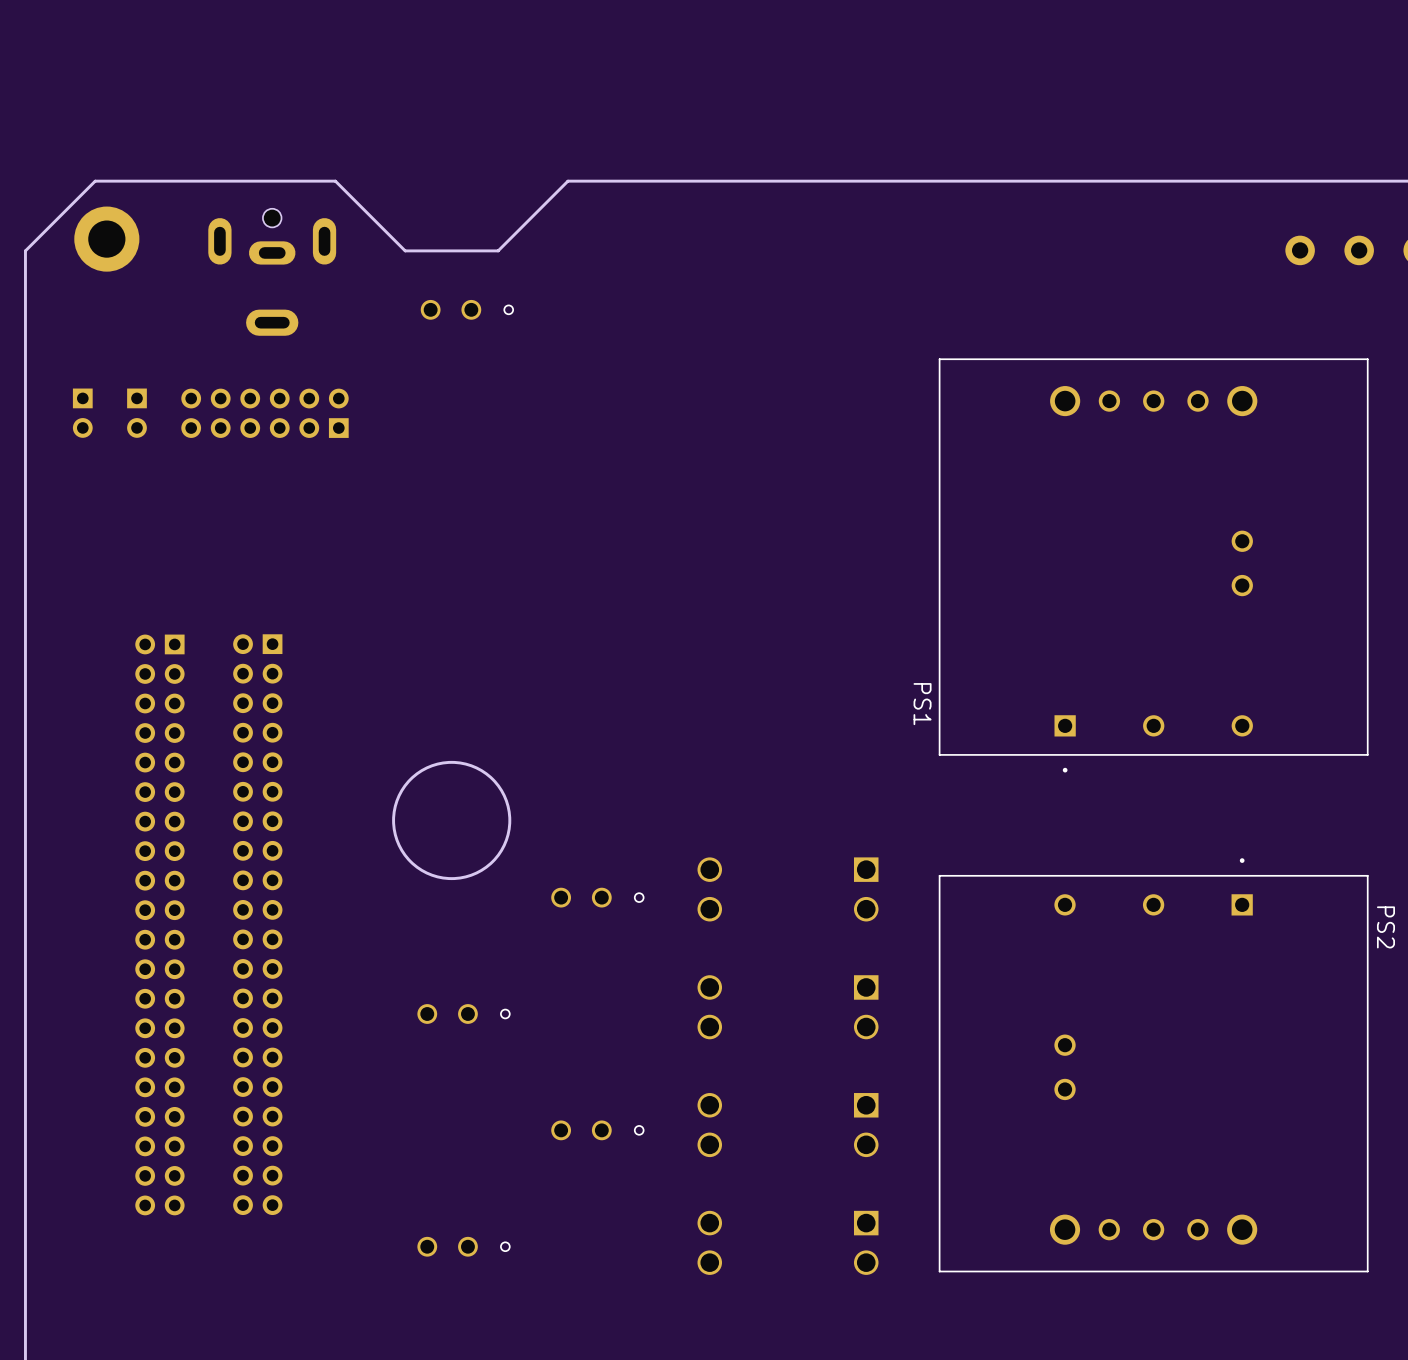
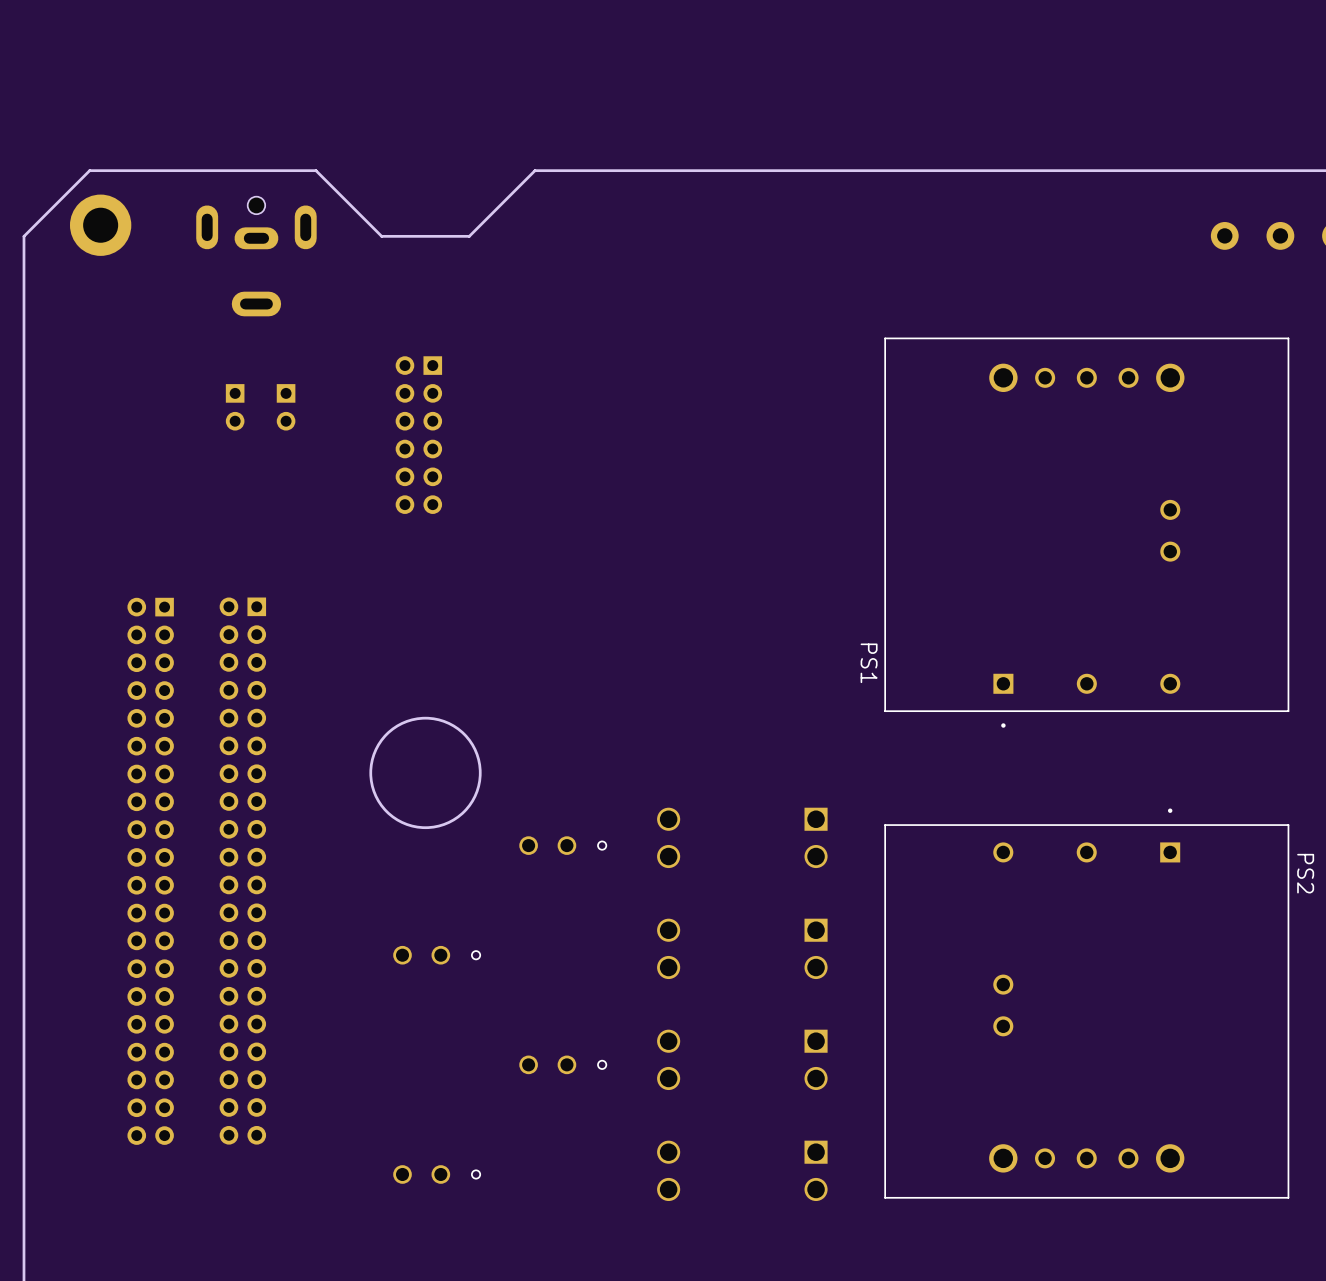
part: (467, 309) -> none
part: (82, 413) -> none
part: (136, 413) -> none
part rotation: 0° (264, 413) -> 90° counterclockwise (418, 435)
part position: (264, 413) -> (418, 435)
part: none -> (235, 407)
part: none -> (286, 407)

